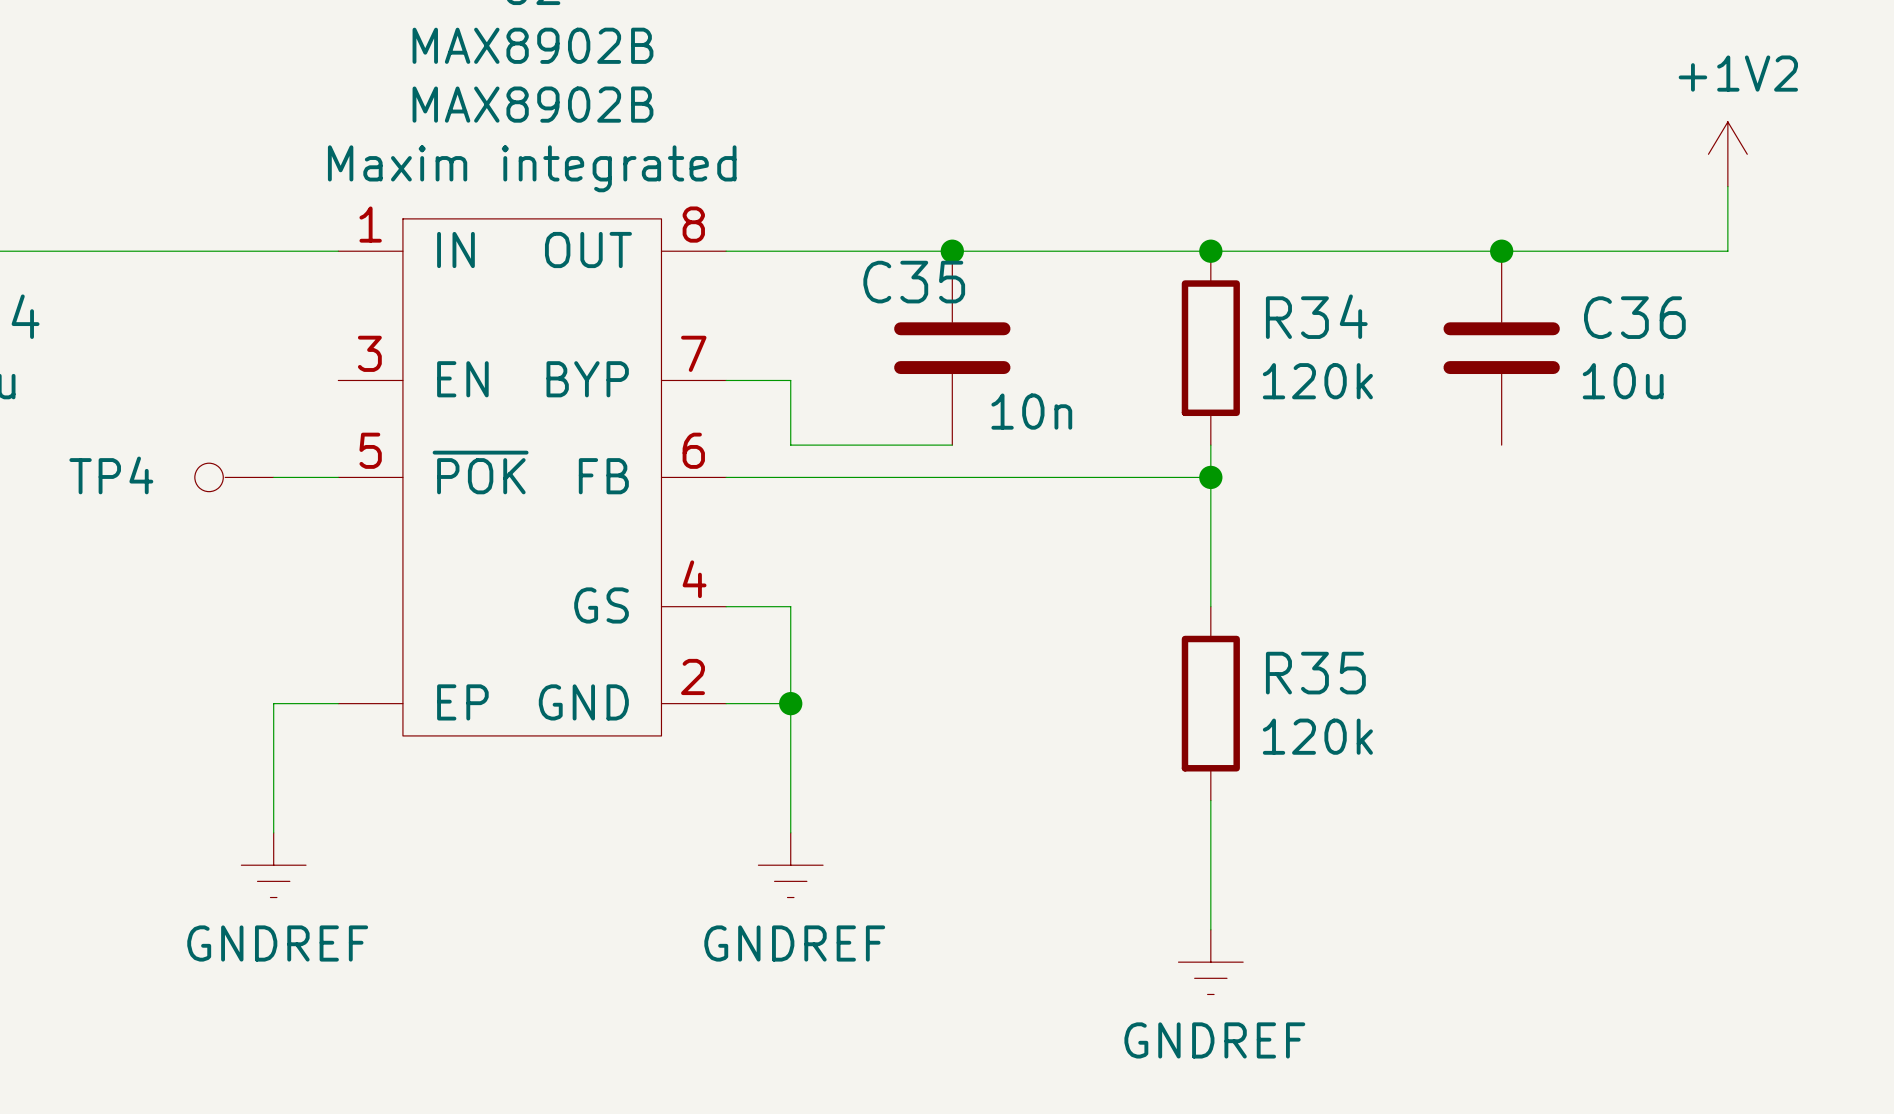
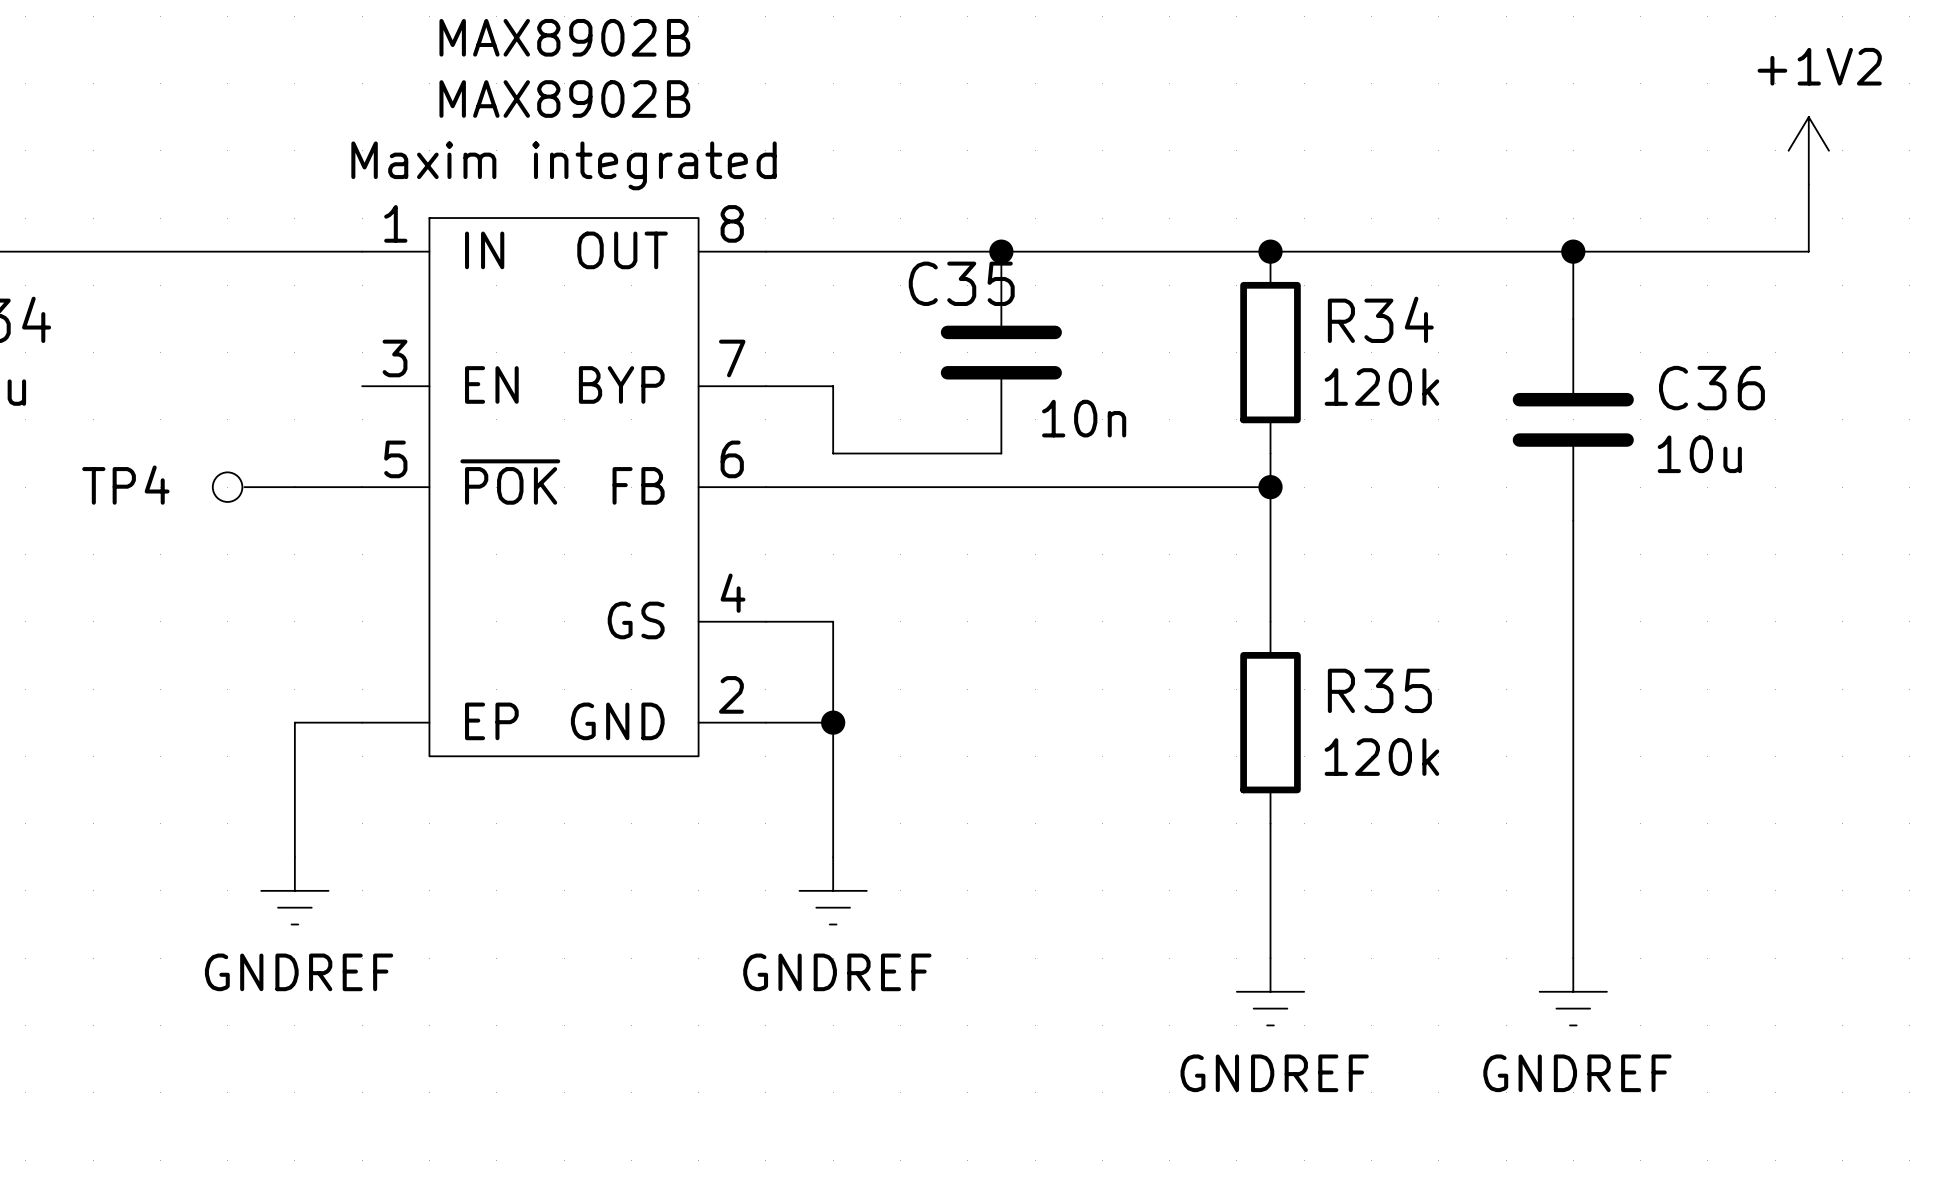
C36 position: (1501, 348) -> (1573, 419)
wire: none -> (1573, 520) (1573, 958)
power symbol: none -> GNDREF (1573, 991)

